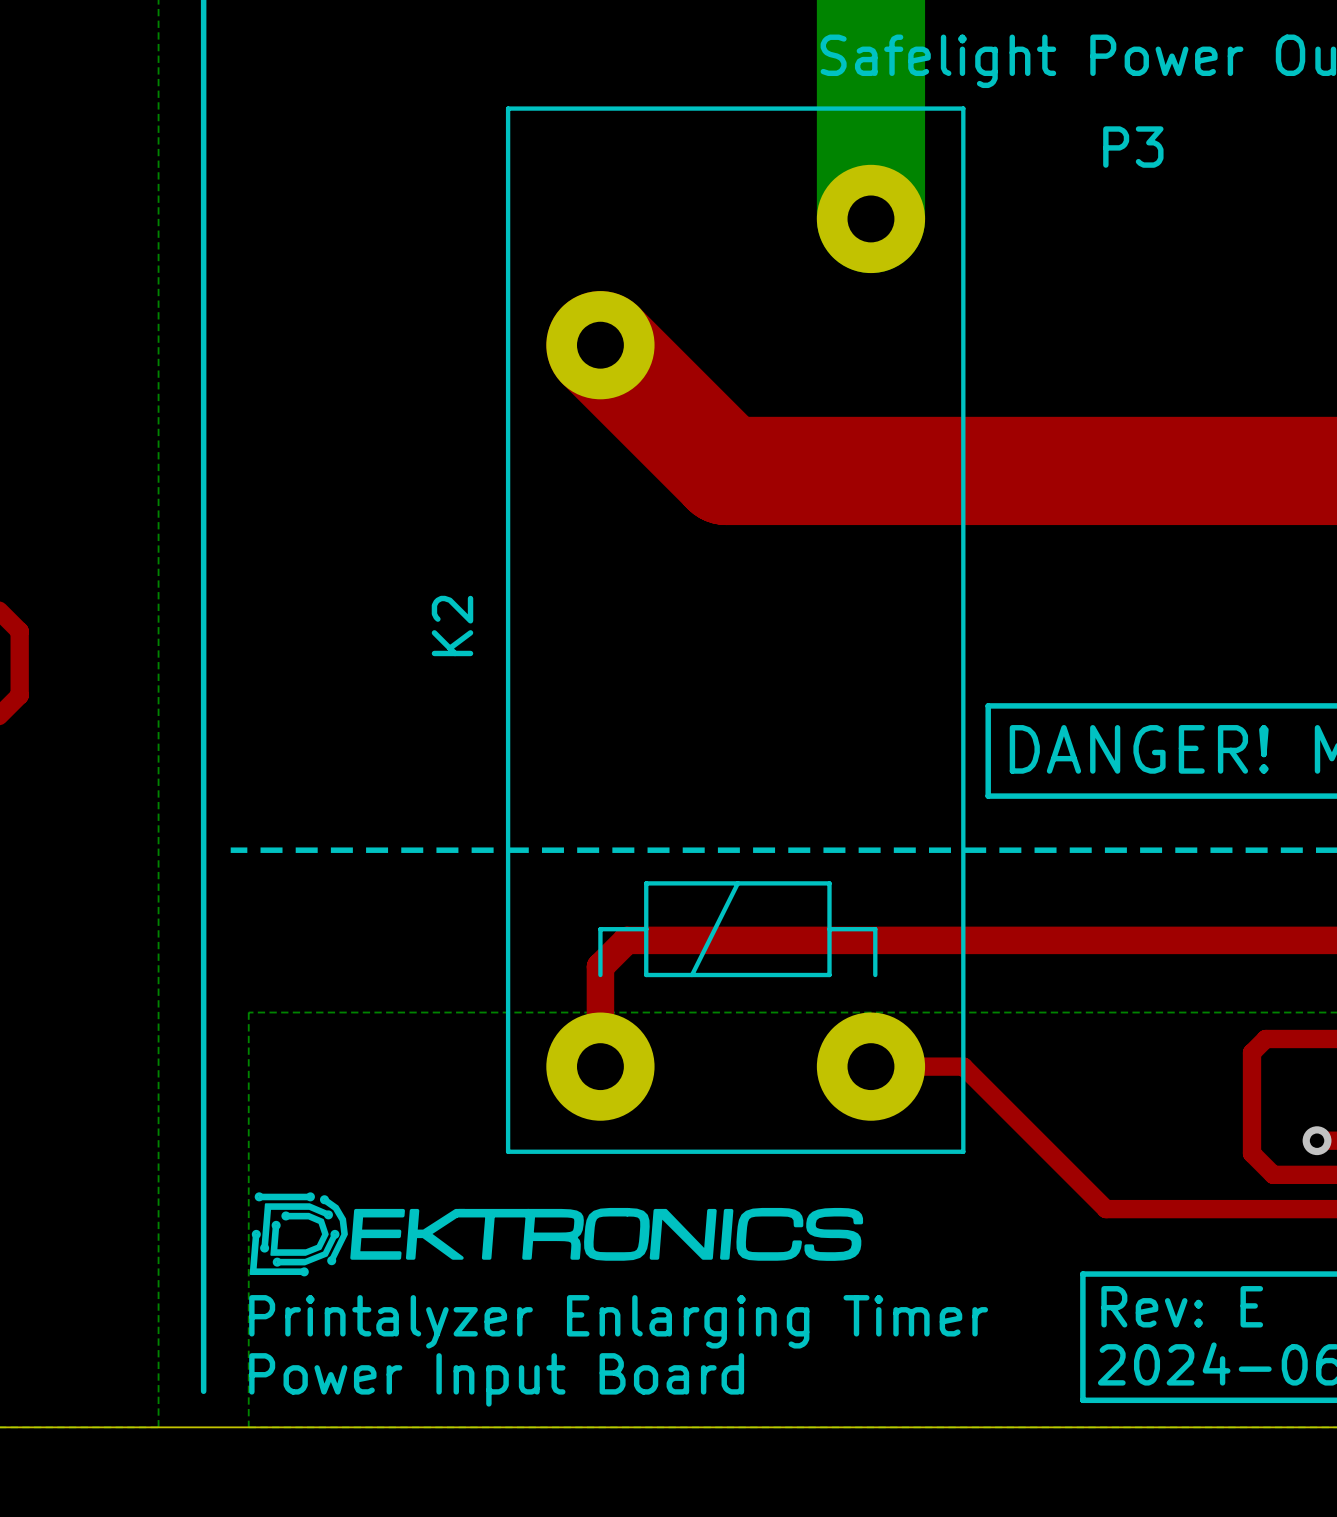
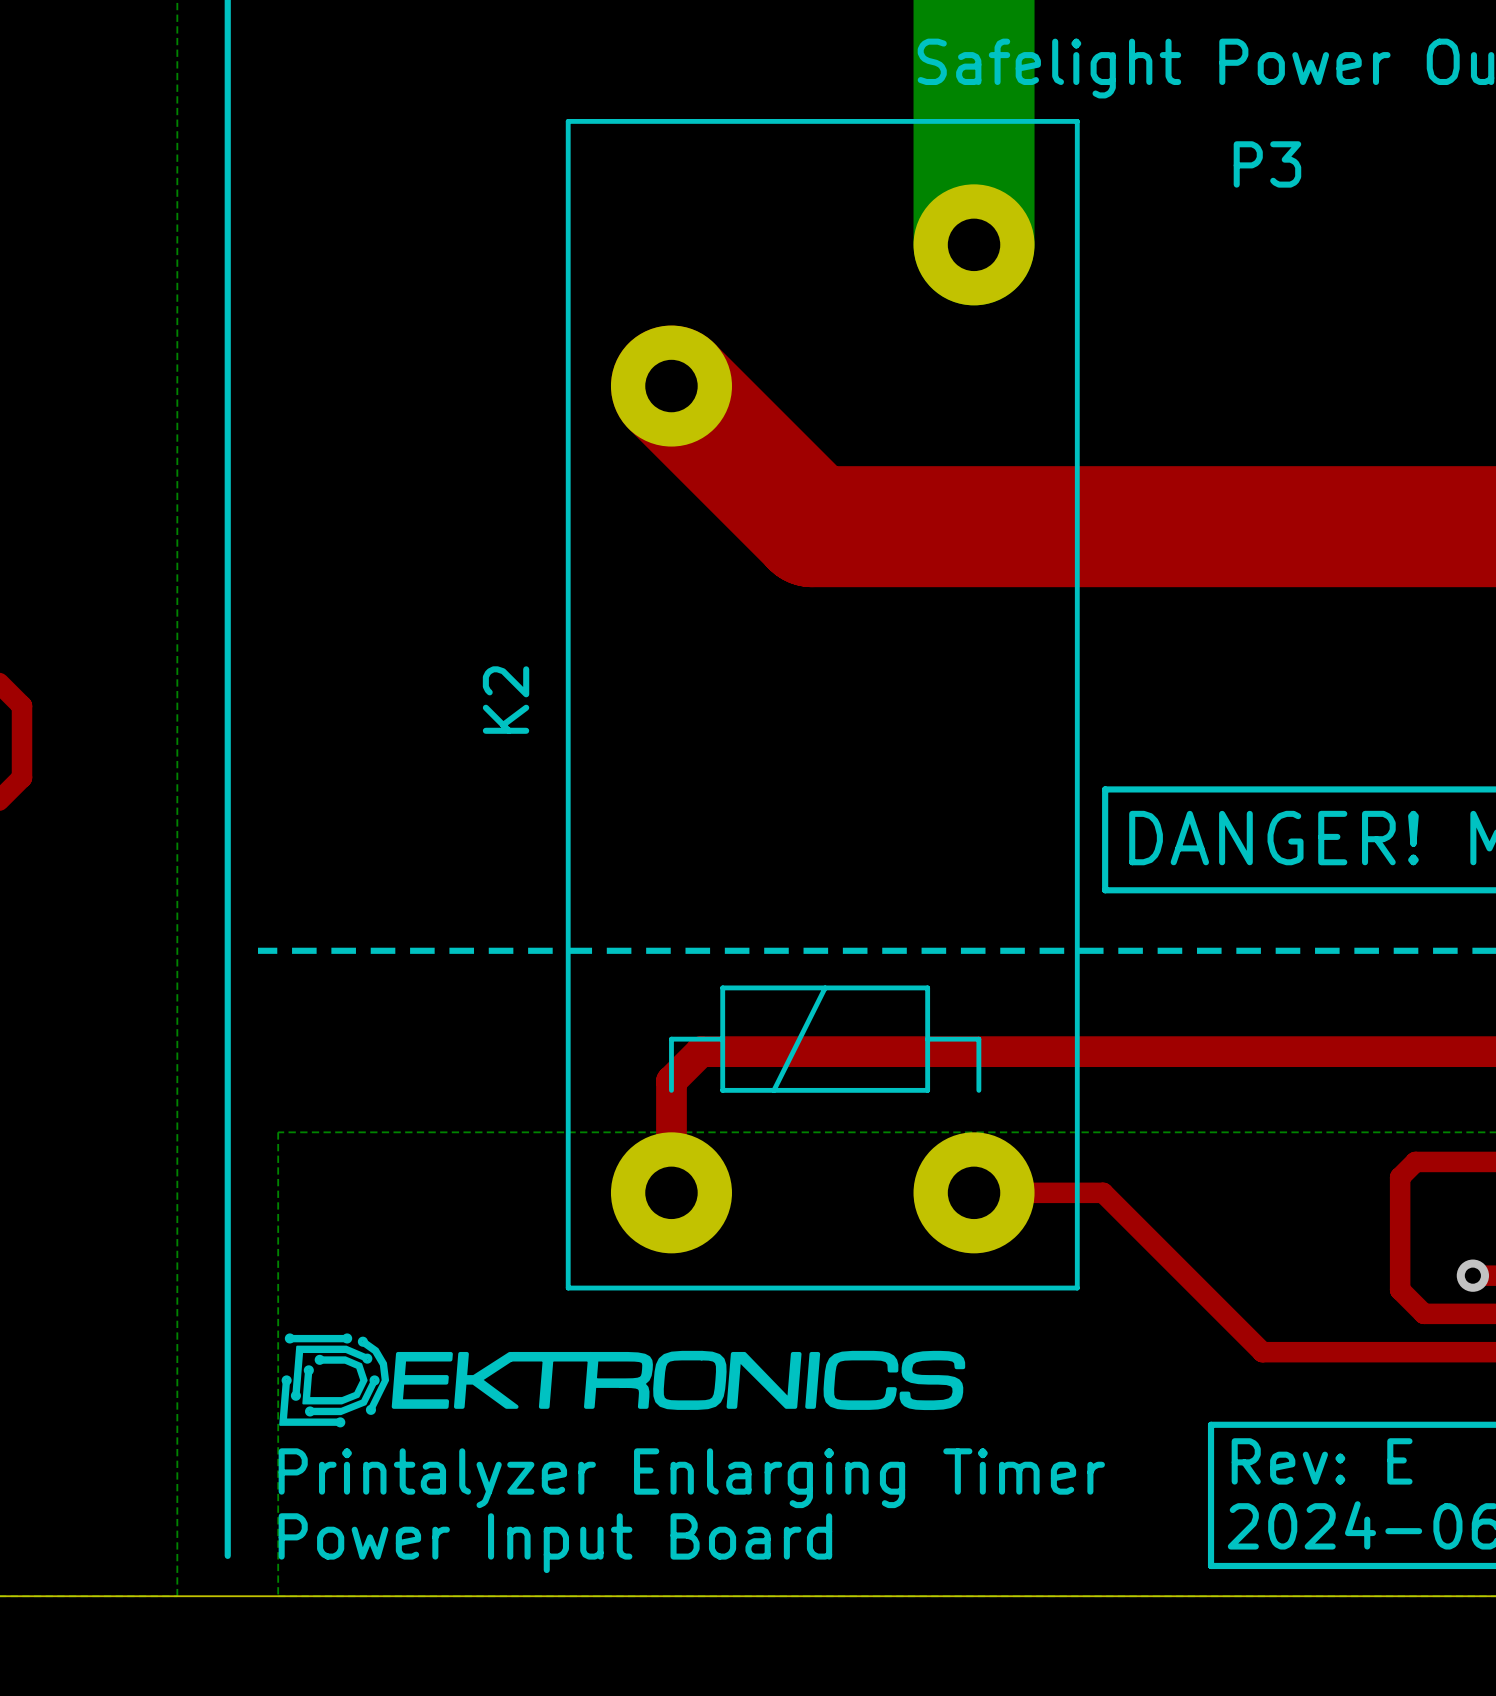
top track: (963, 1066) (1106, 1209) (1128, 1209) -> (1077, 1192) (1103, 1192) (1262, 1352)

